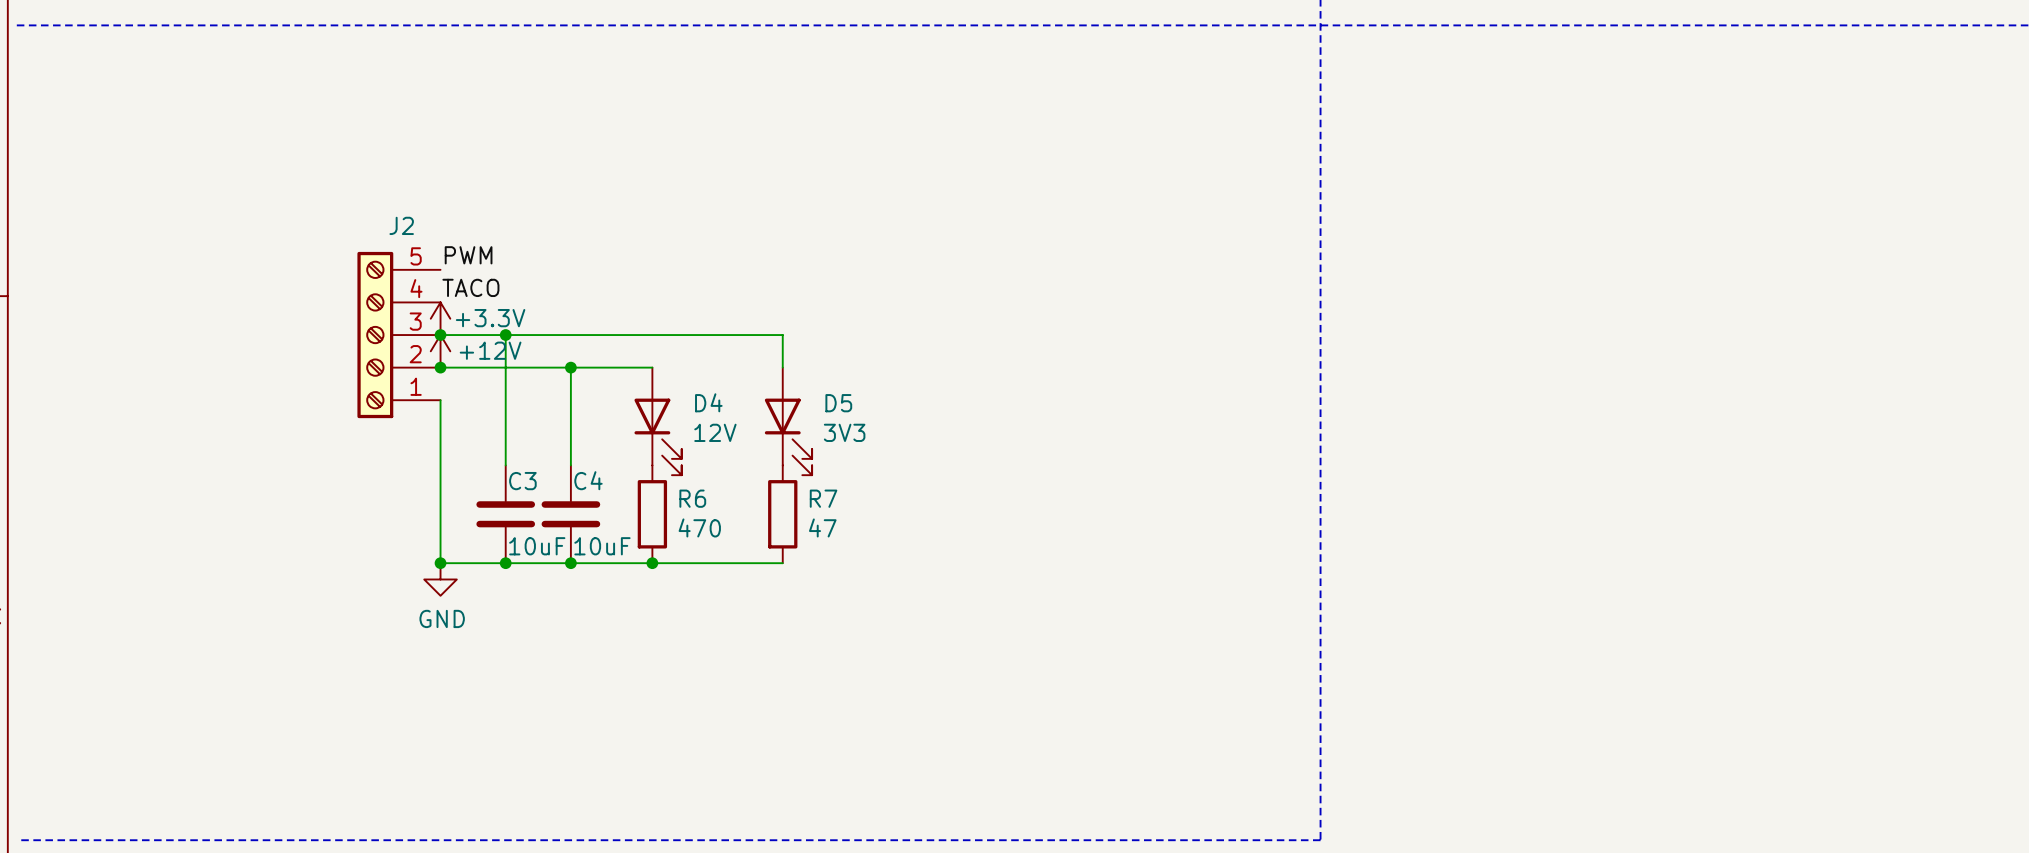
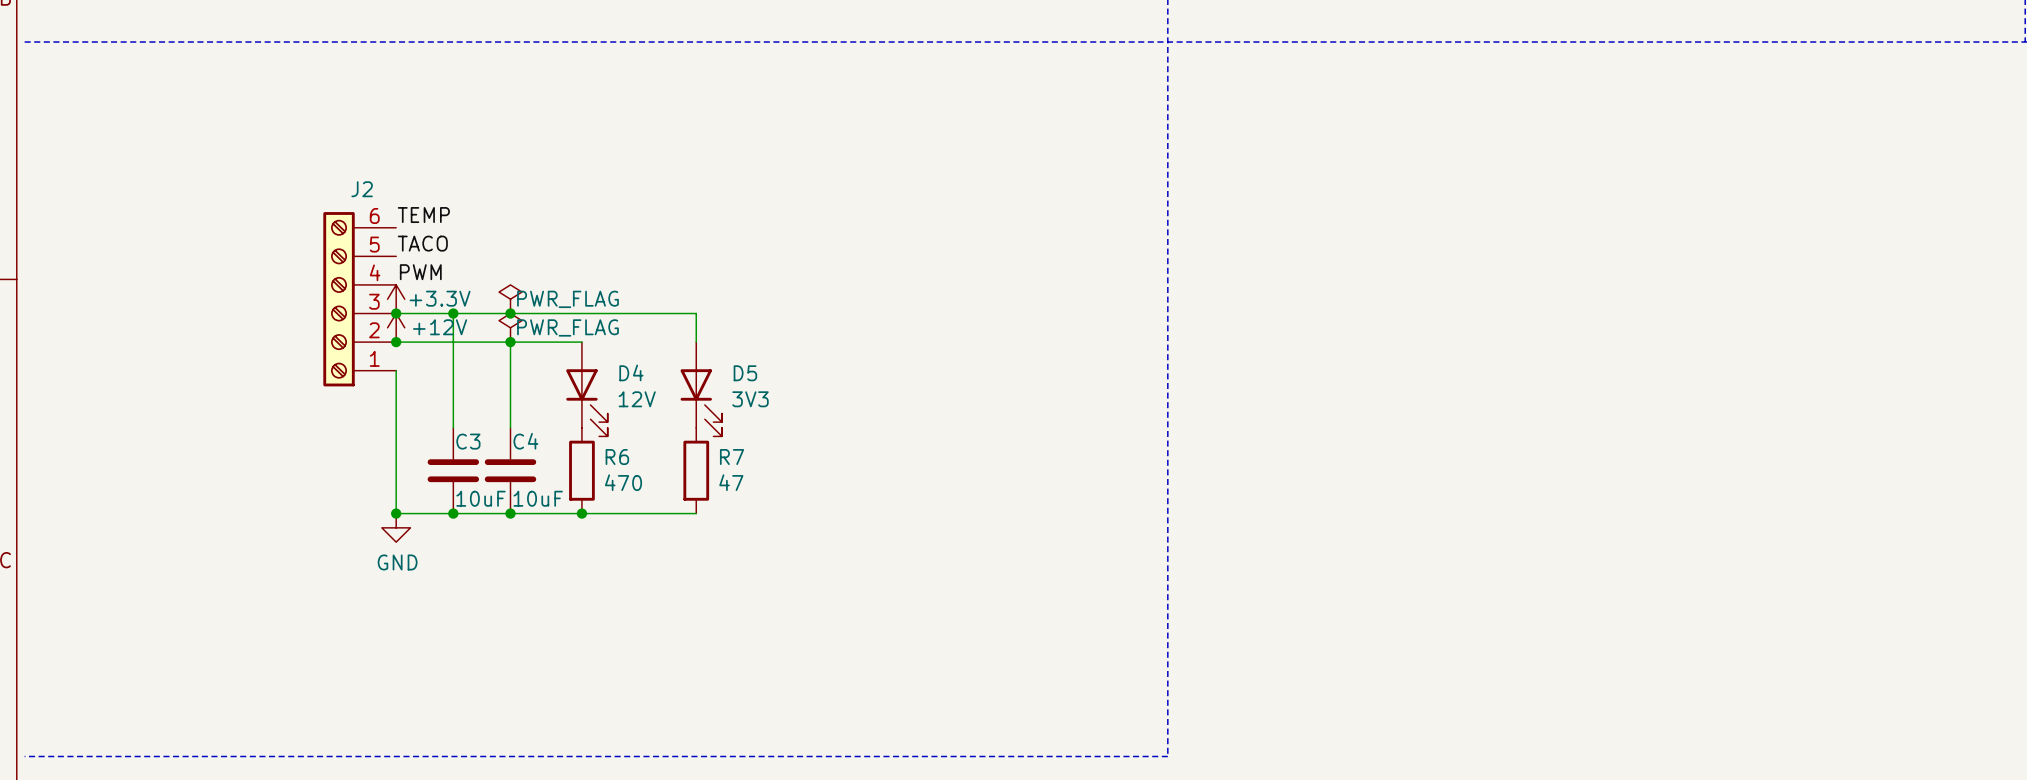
label: none -> TEMP (423, 215)
J2 symbol: [357, 251, 441, 419] -> [323, 212, 397, 387]
label: PWM (468, 255) -> TACO (422, 243)
label: TACO (470, 287) -> PWM (420, 272)
power symbol: none -> PWR_FLAG (510, 299)
junction: none -> (510, 313)
power symbol: none -> PWR_FLAG (510, 327)

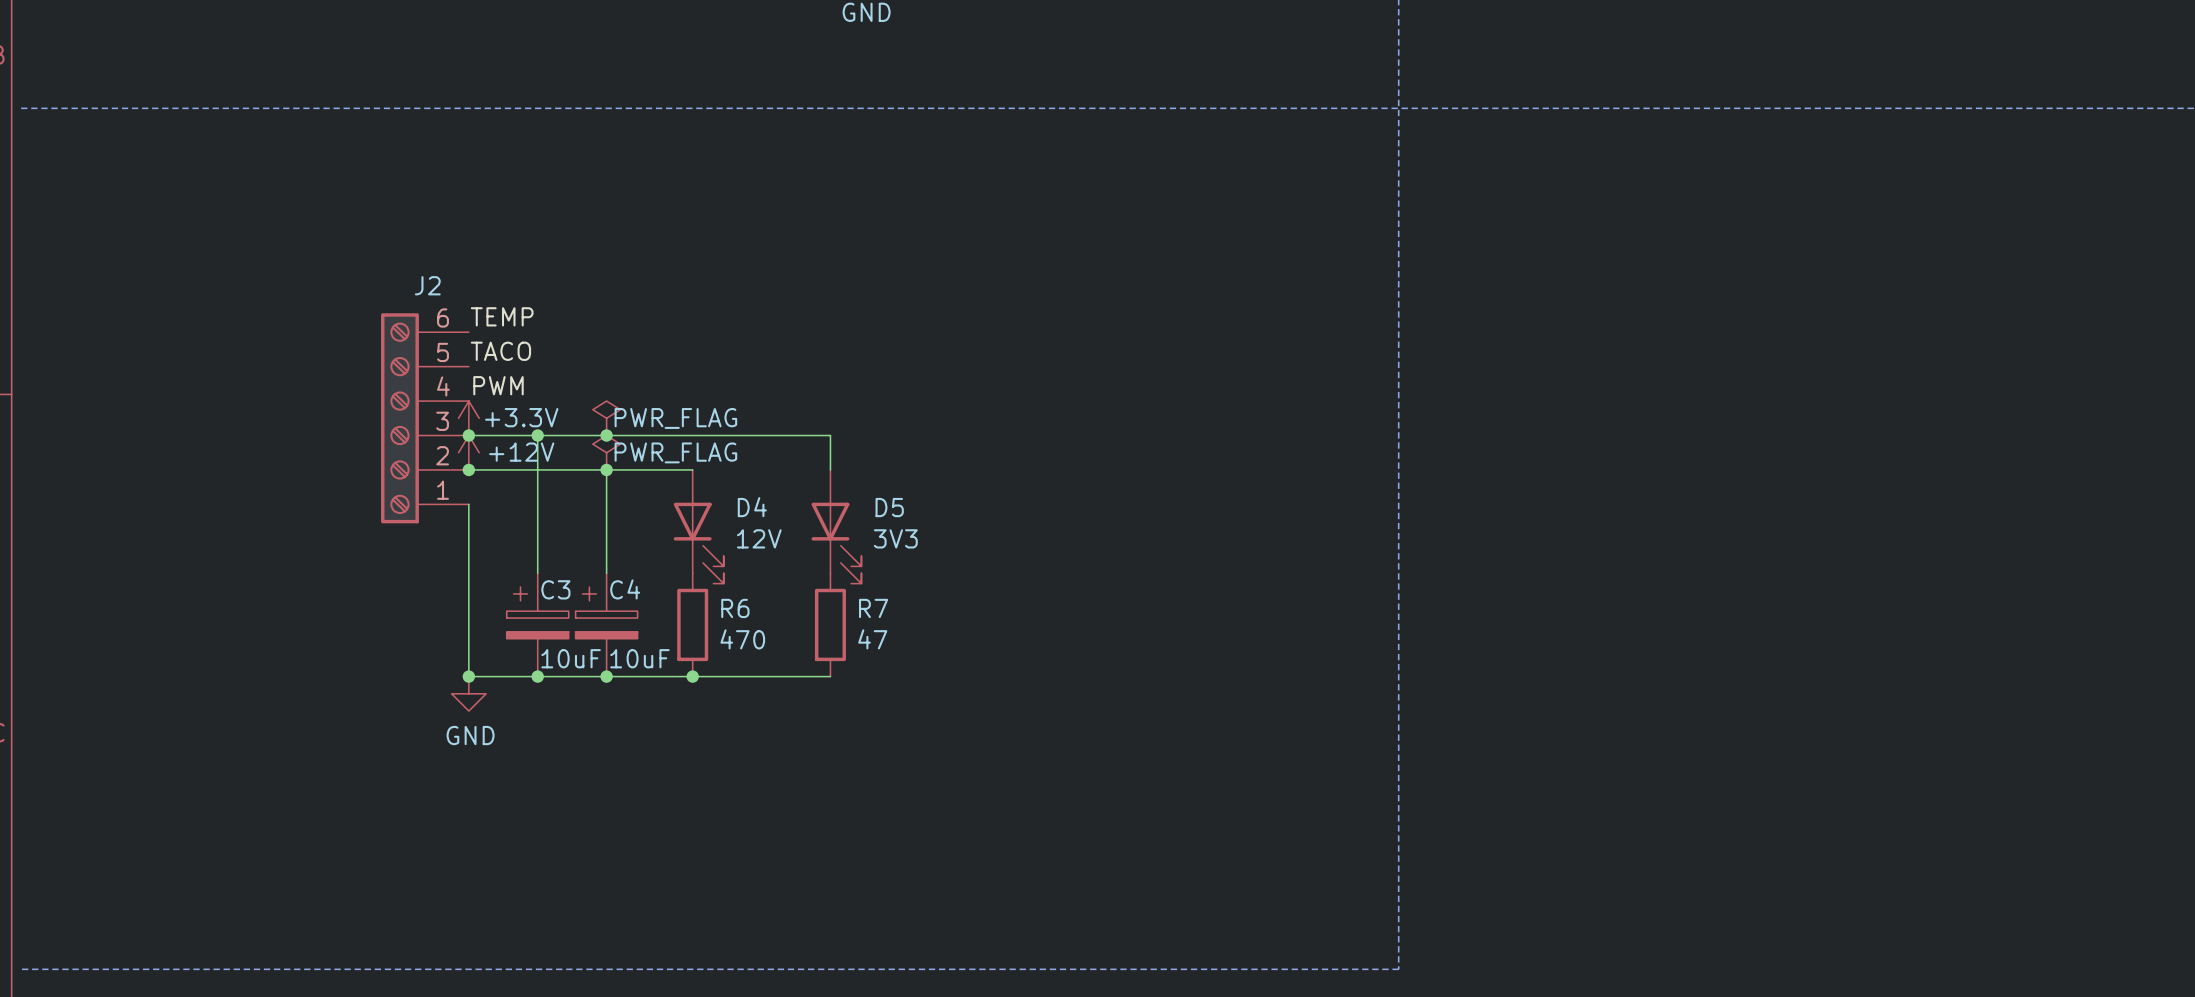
C3 symbol: [427, 427, 480, 514] -> [506, 573, 569, 677]
C4 symbol: [484, 427, 537, 514] -> [575, 573, 638, 677]

